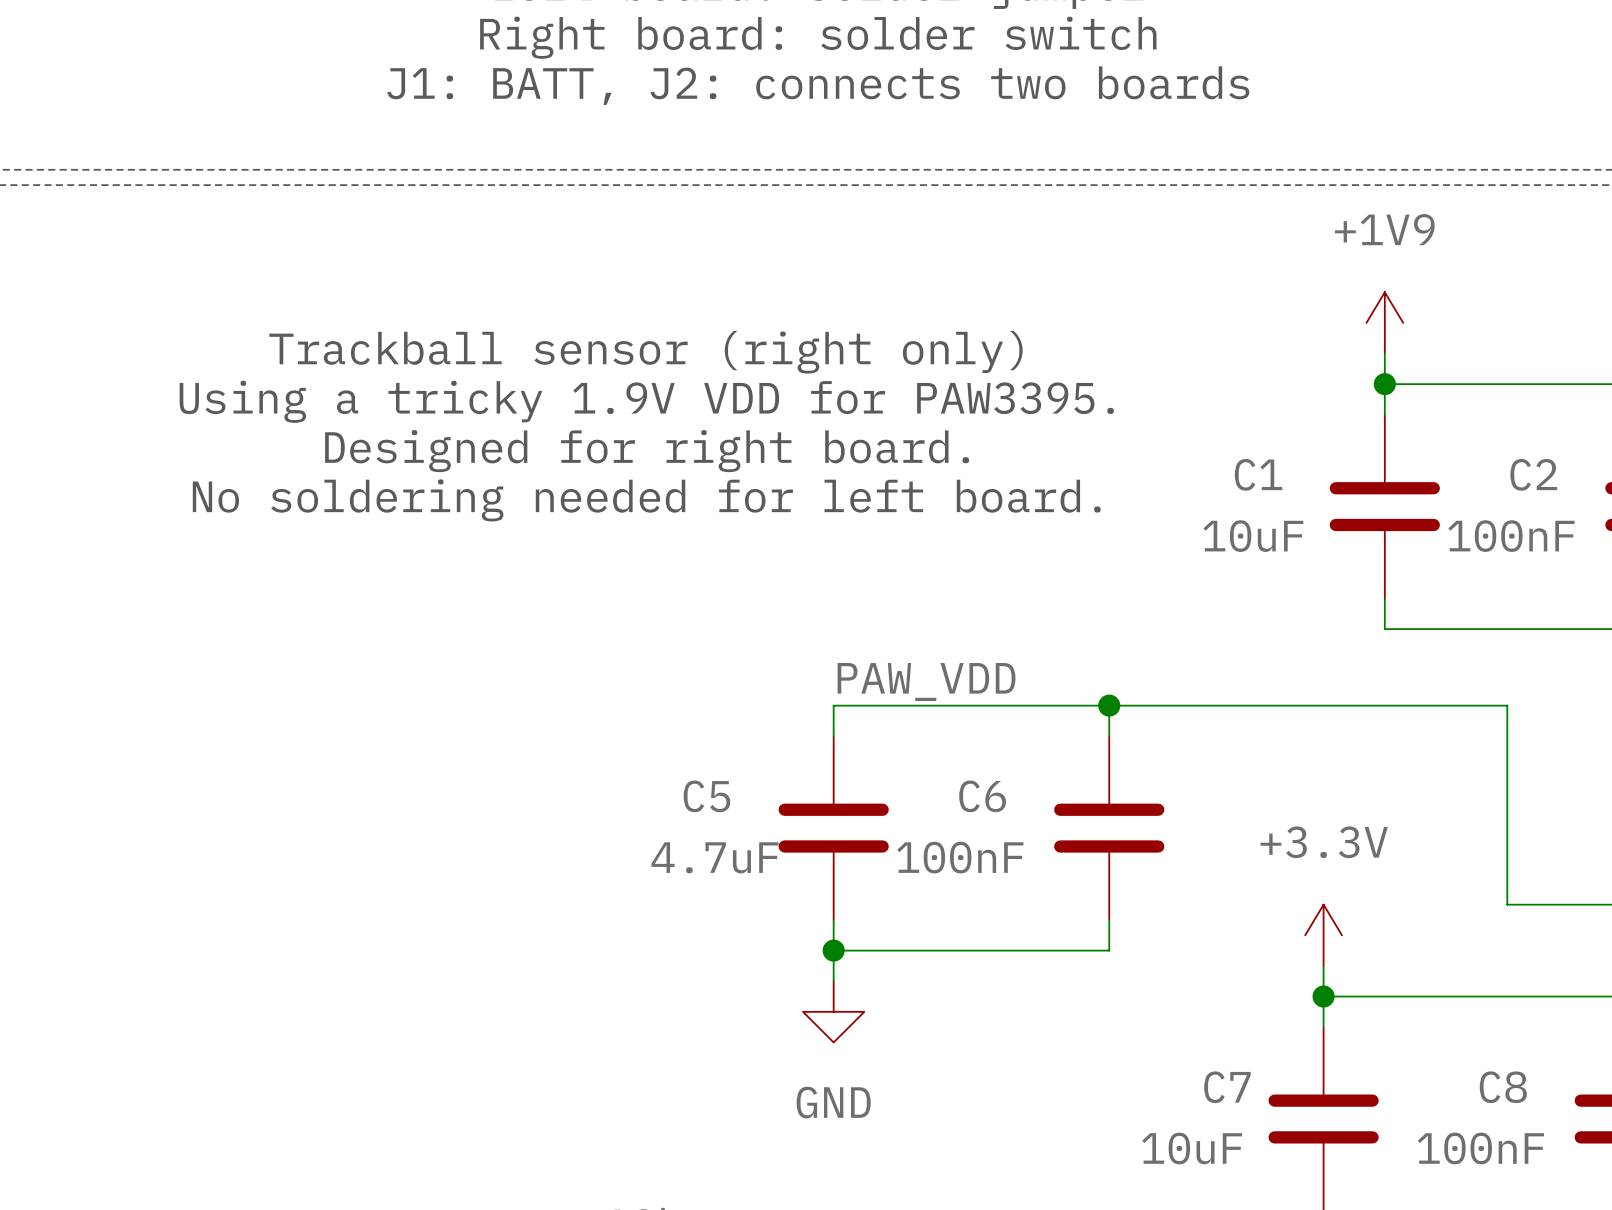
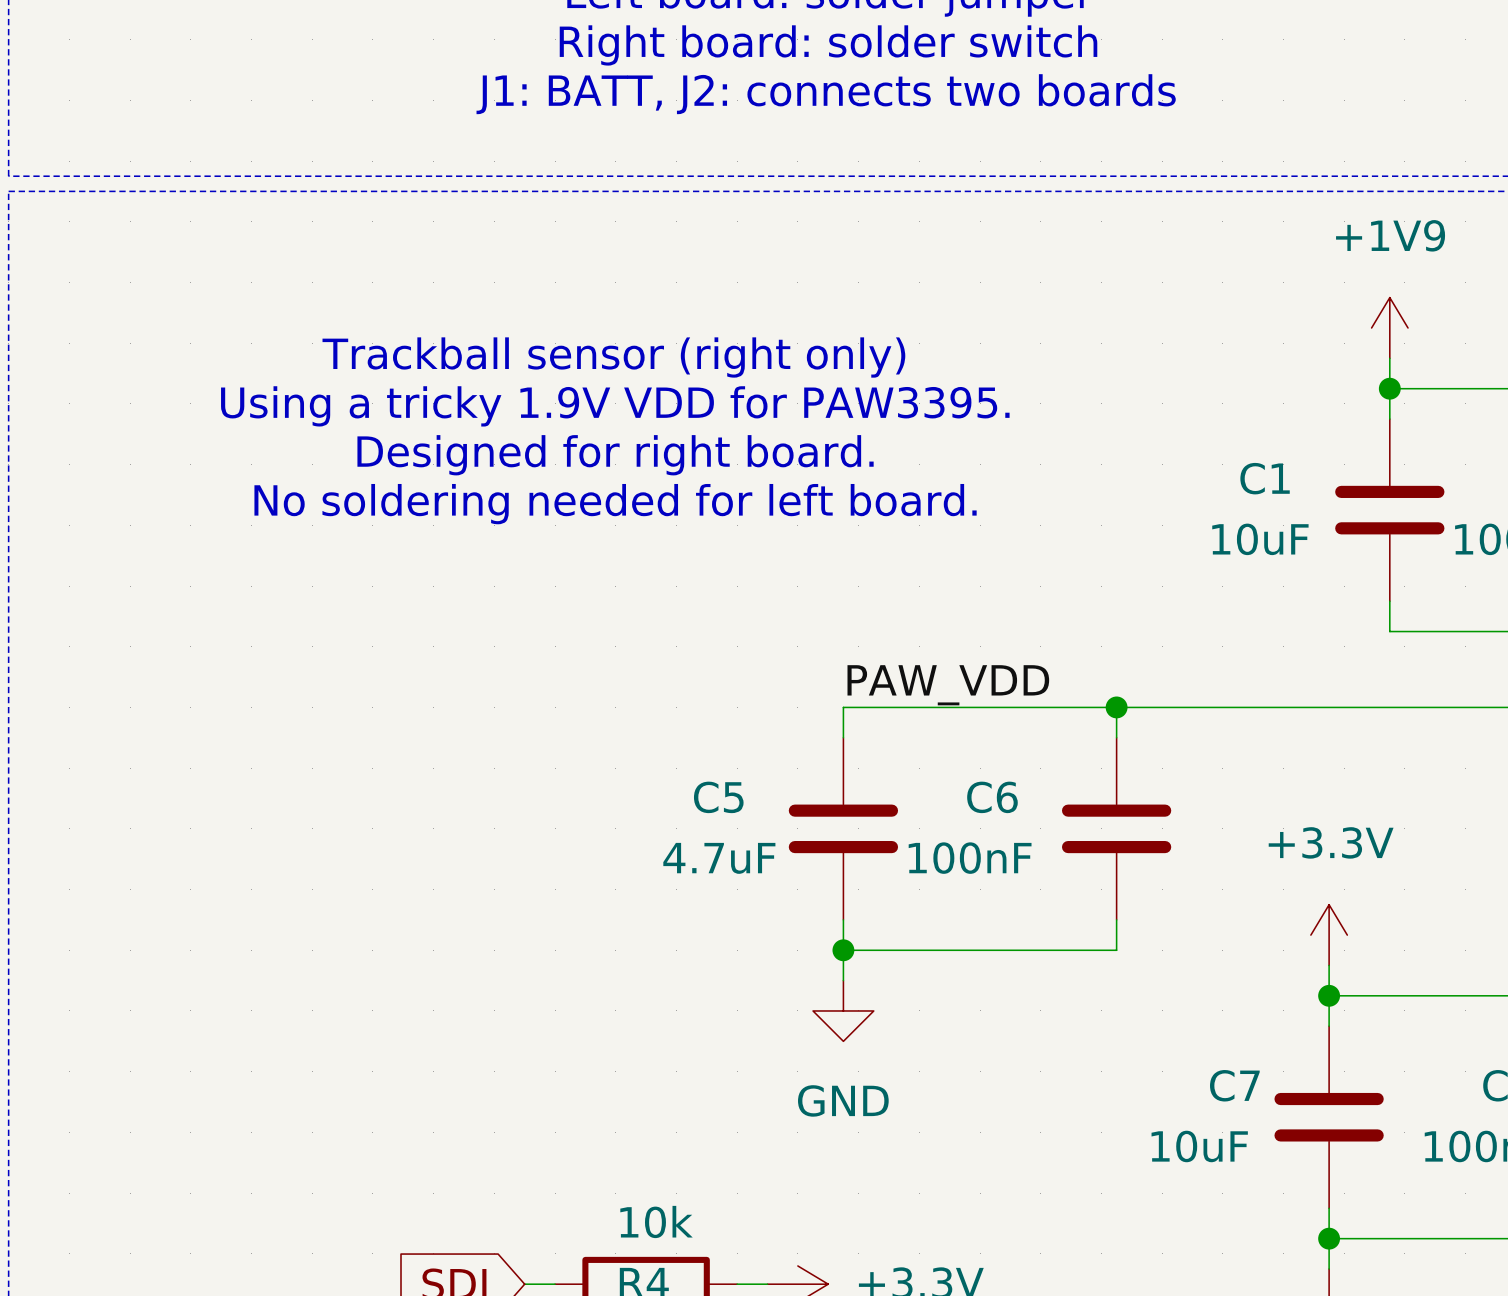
text position: Trackball sensor (right only) (645, 352) -> Trackball sensor (right only) (613, 357)
text position: Using a tricky 1.9V VDD for PAW3395. (646, 401) -> Using a tricky 1.9V VDD for PAW3395. (615, 406)
text position: Designed for right board. (647, 451) -> Designed for right board. (615, 455)
text position: No soldering needed for left board. (646, 500) -> No soldering needed for left board. (615, 504)

